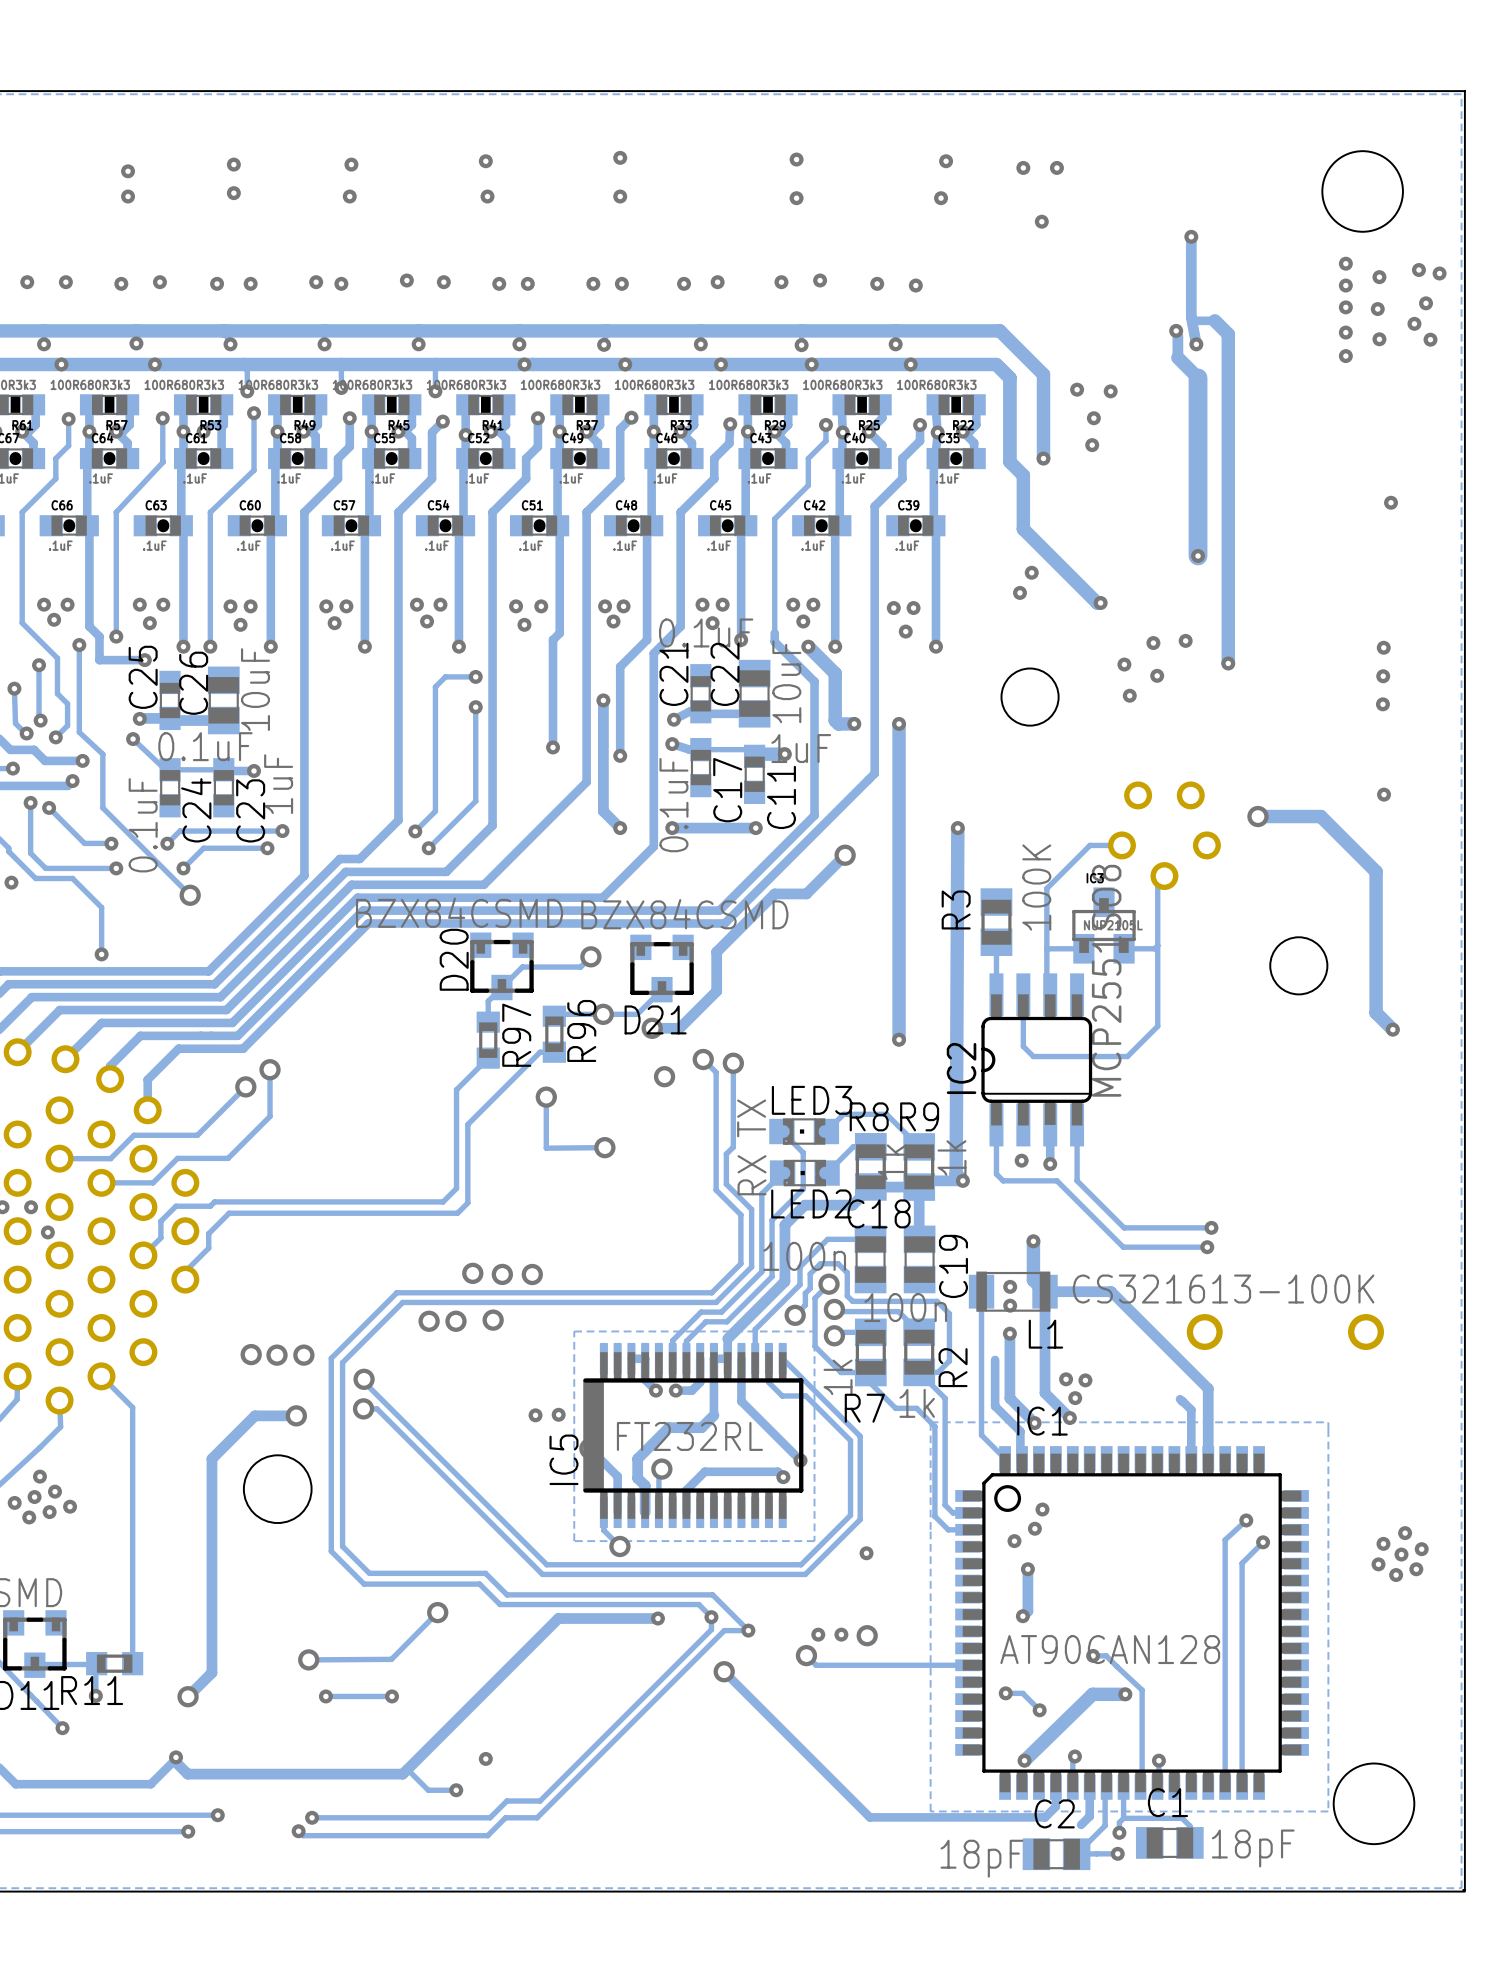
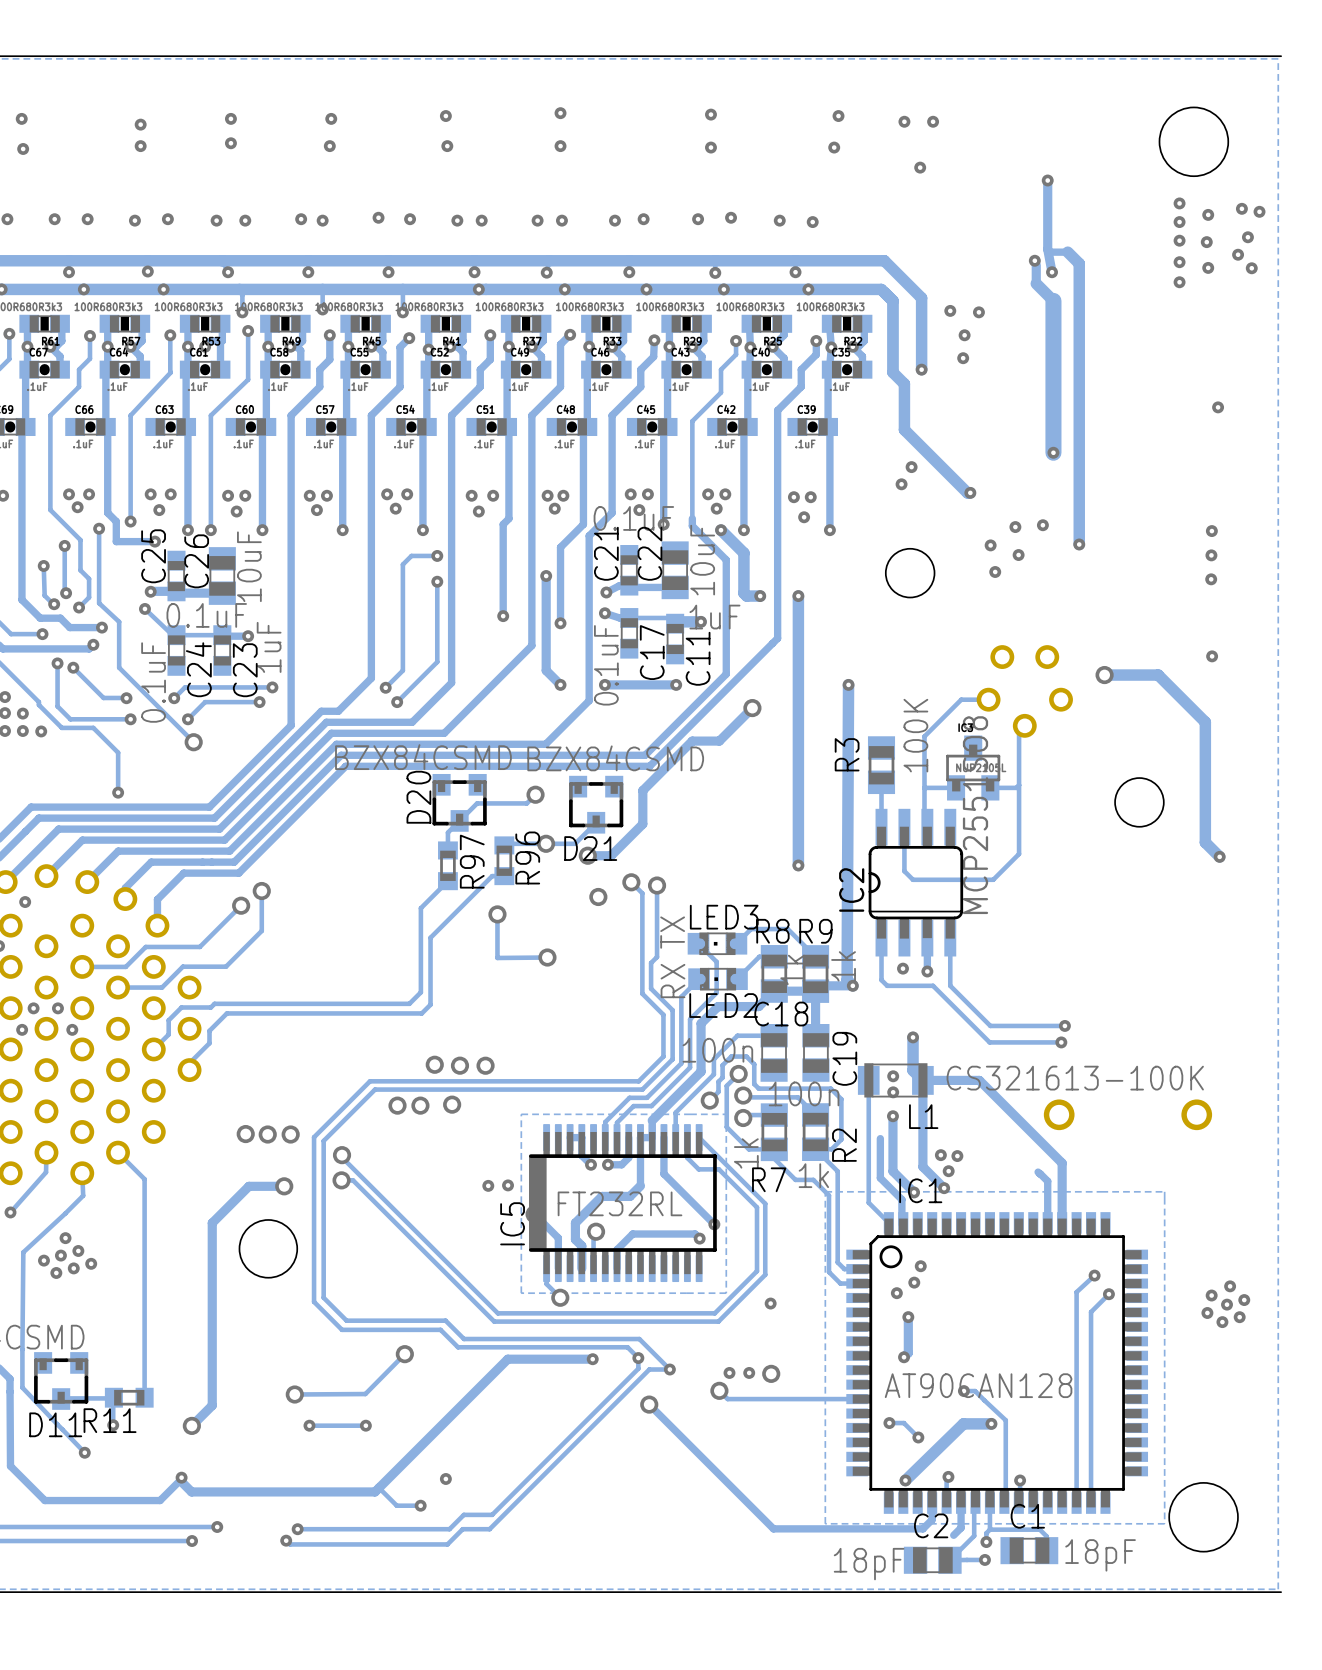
board edge: (1464, 91) (1464, 1889) (1463, 1889) -> none

